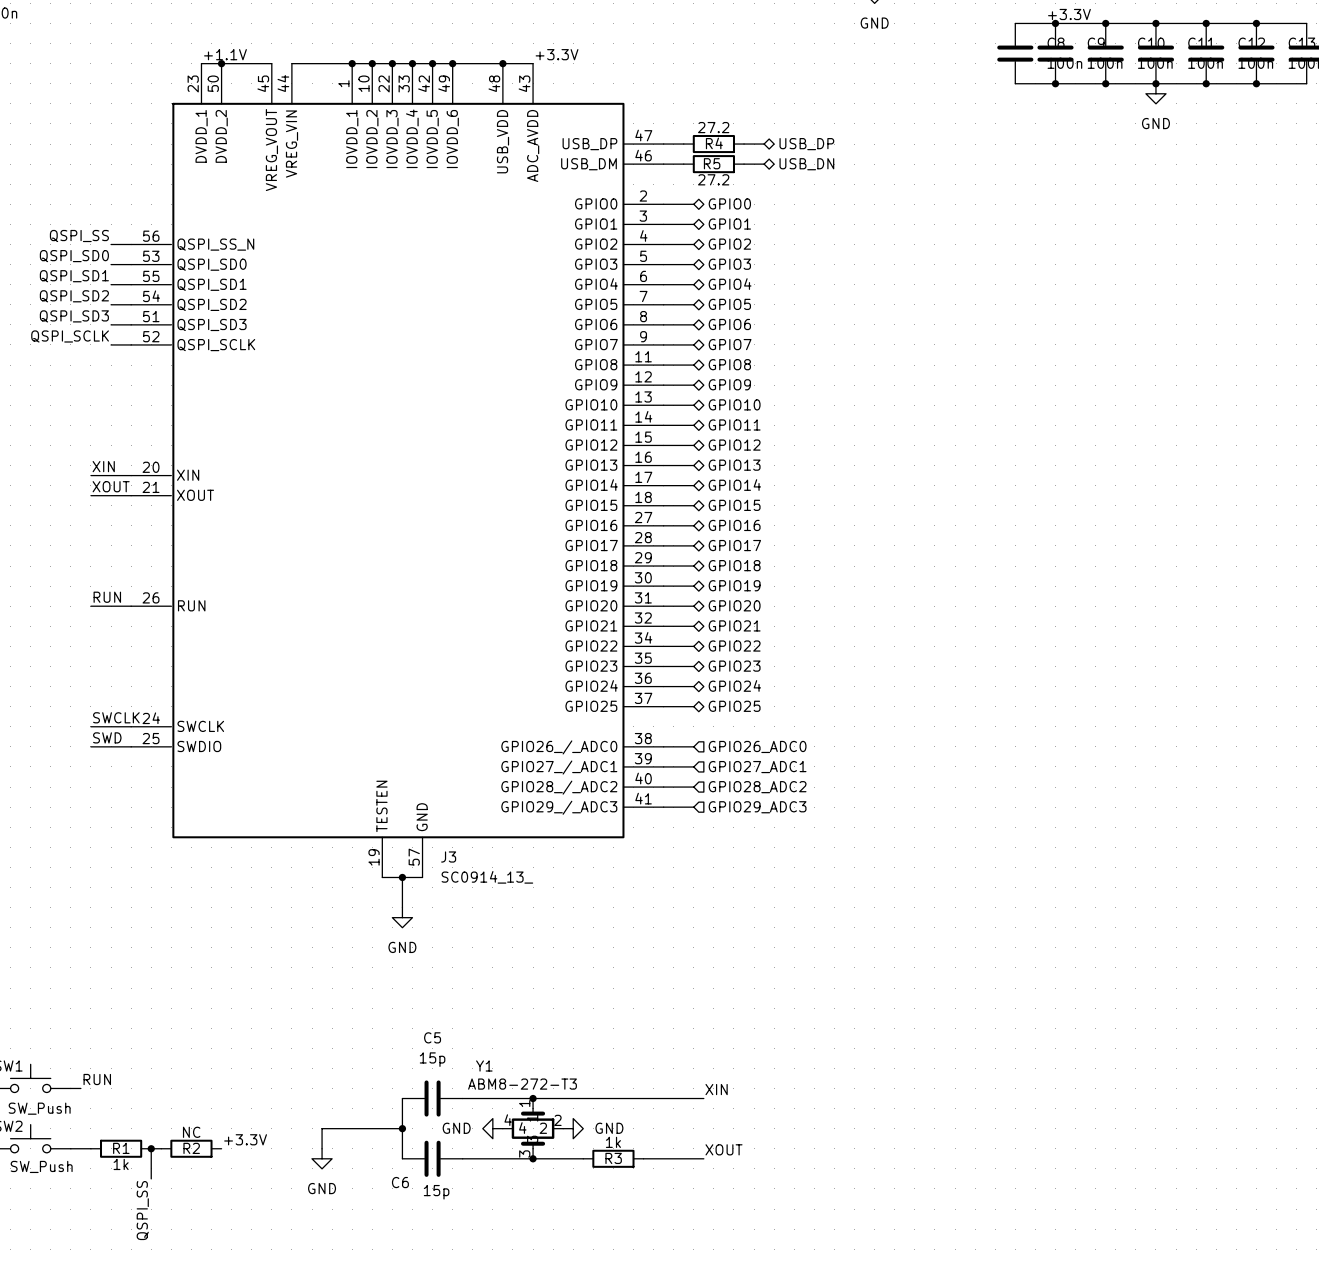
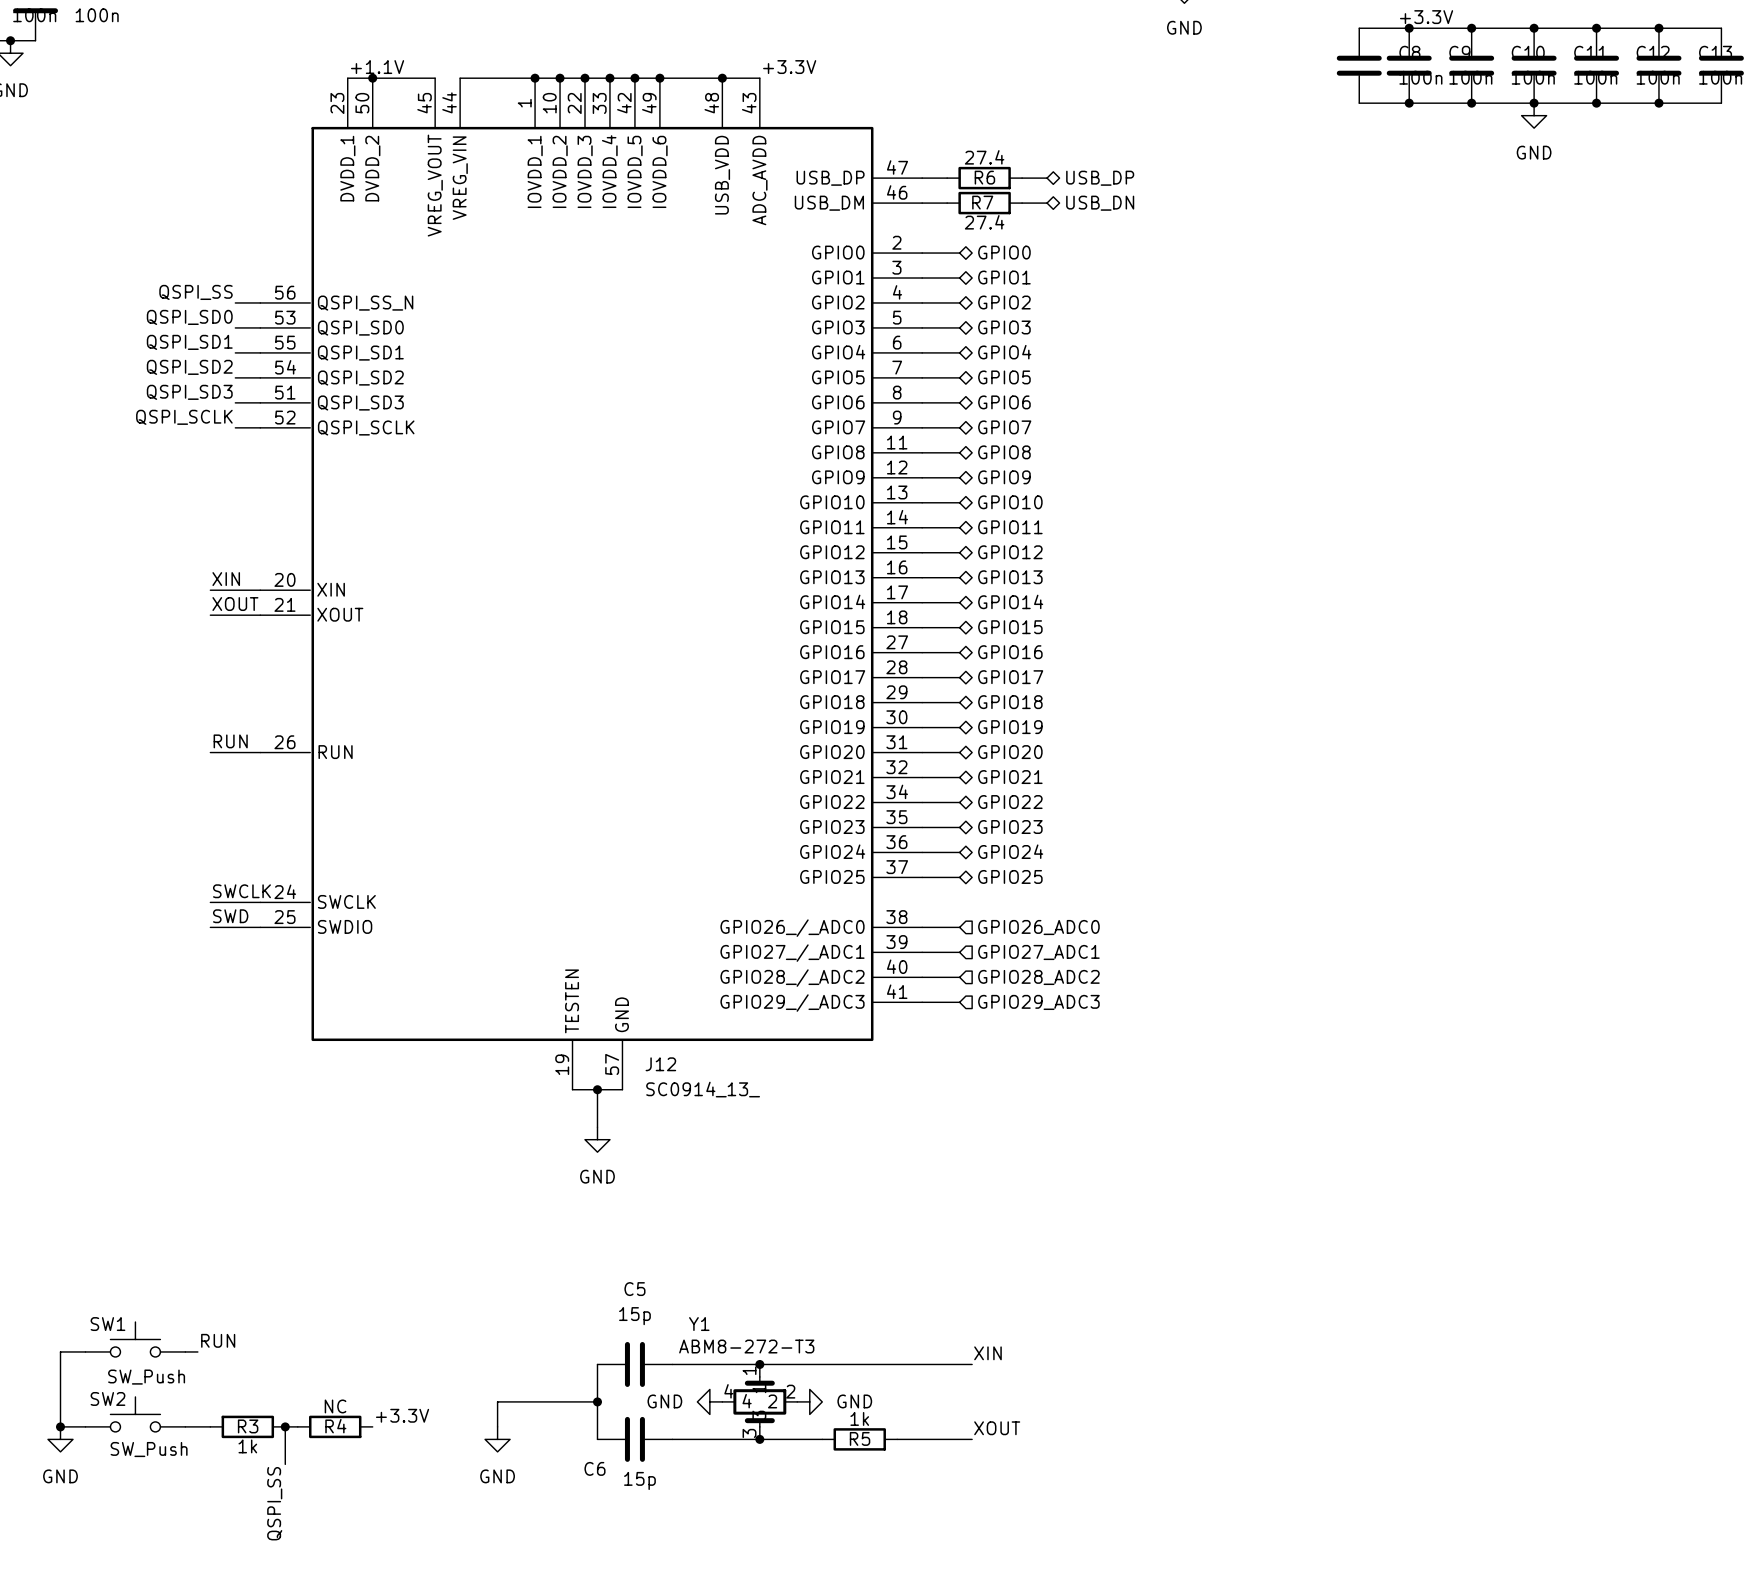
R4 value: 27.2 (713, 127) -> 27.4 (984, 157)
R4 name: R4 (714, 143) -> R6 (984, 177)
R5 name: R5 (712, 163) -> R7 (982, 202)
R5 value: 27.2 (713, 179) -> 27.4 (984, 222)
J3 name: J3 (448, 857) -> J12 (660, 1064)
R1 name: R1 (121, 1148) -> R3 (248, 1426)
R2 name: R2 (191, 1148) -> R4 (335, 1426)
R3 name: R3 (613, 1158) -> R5 (860, 1438)

